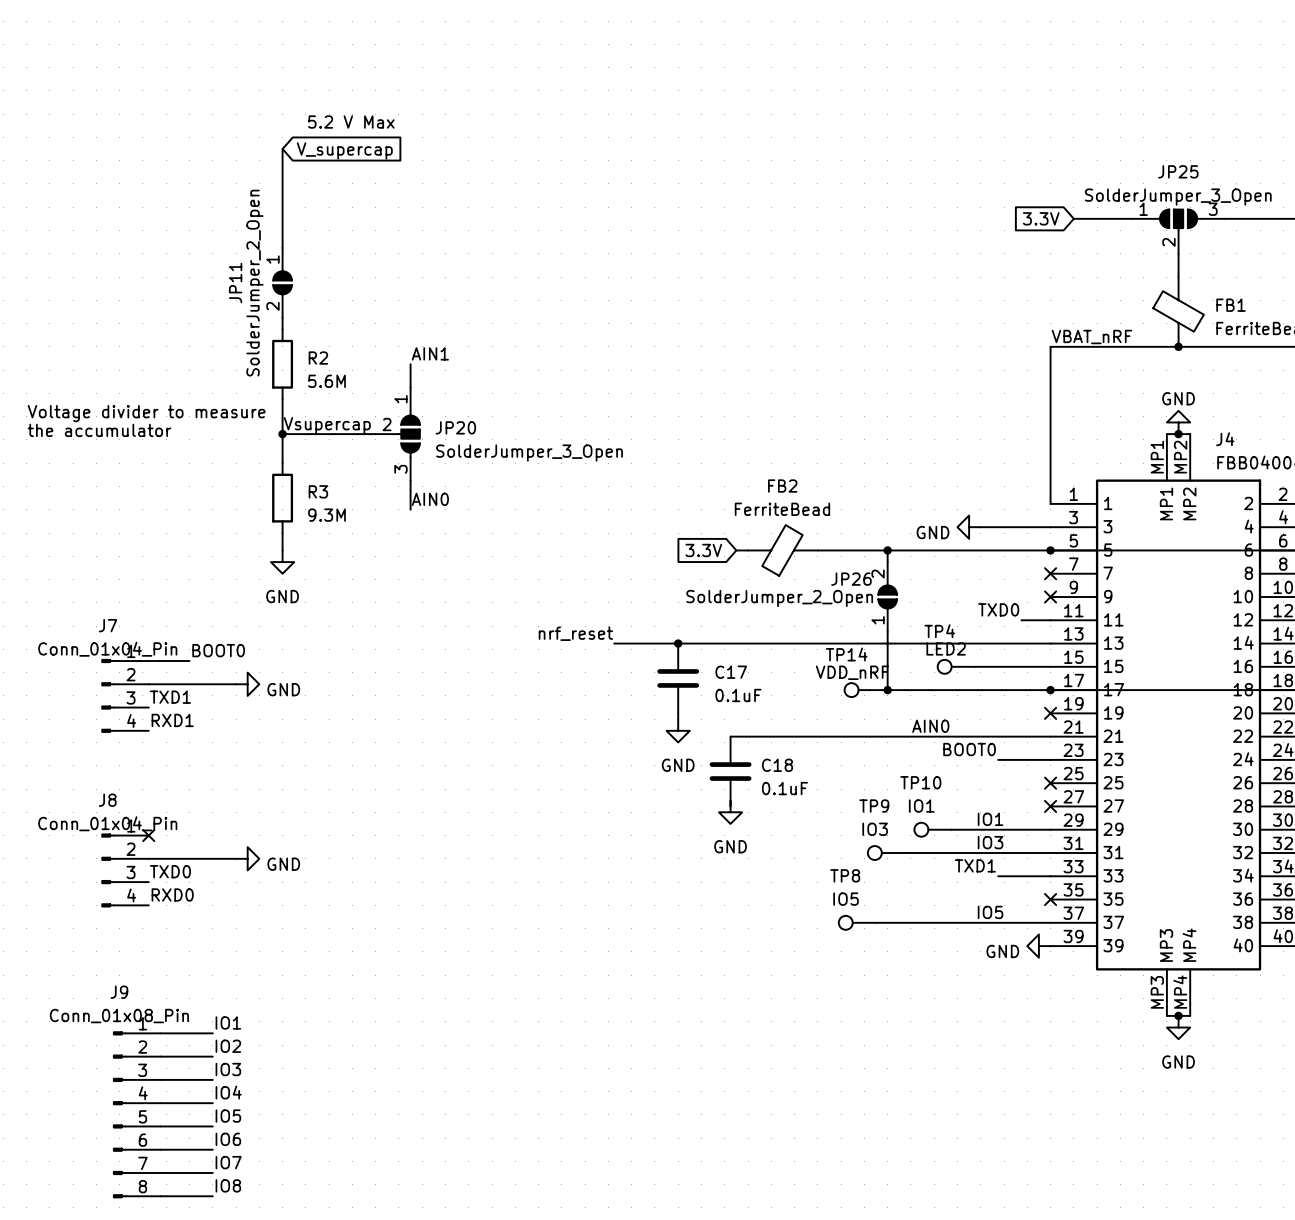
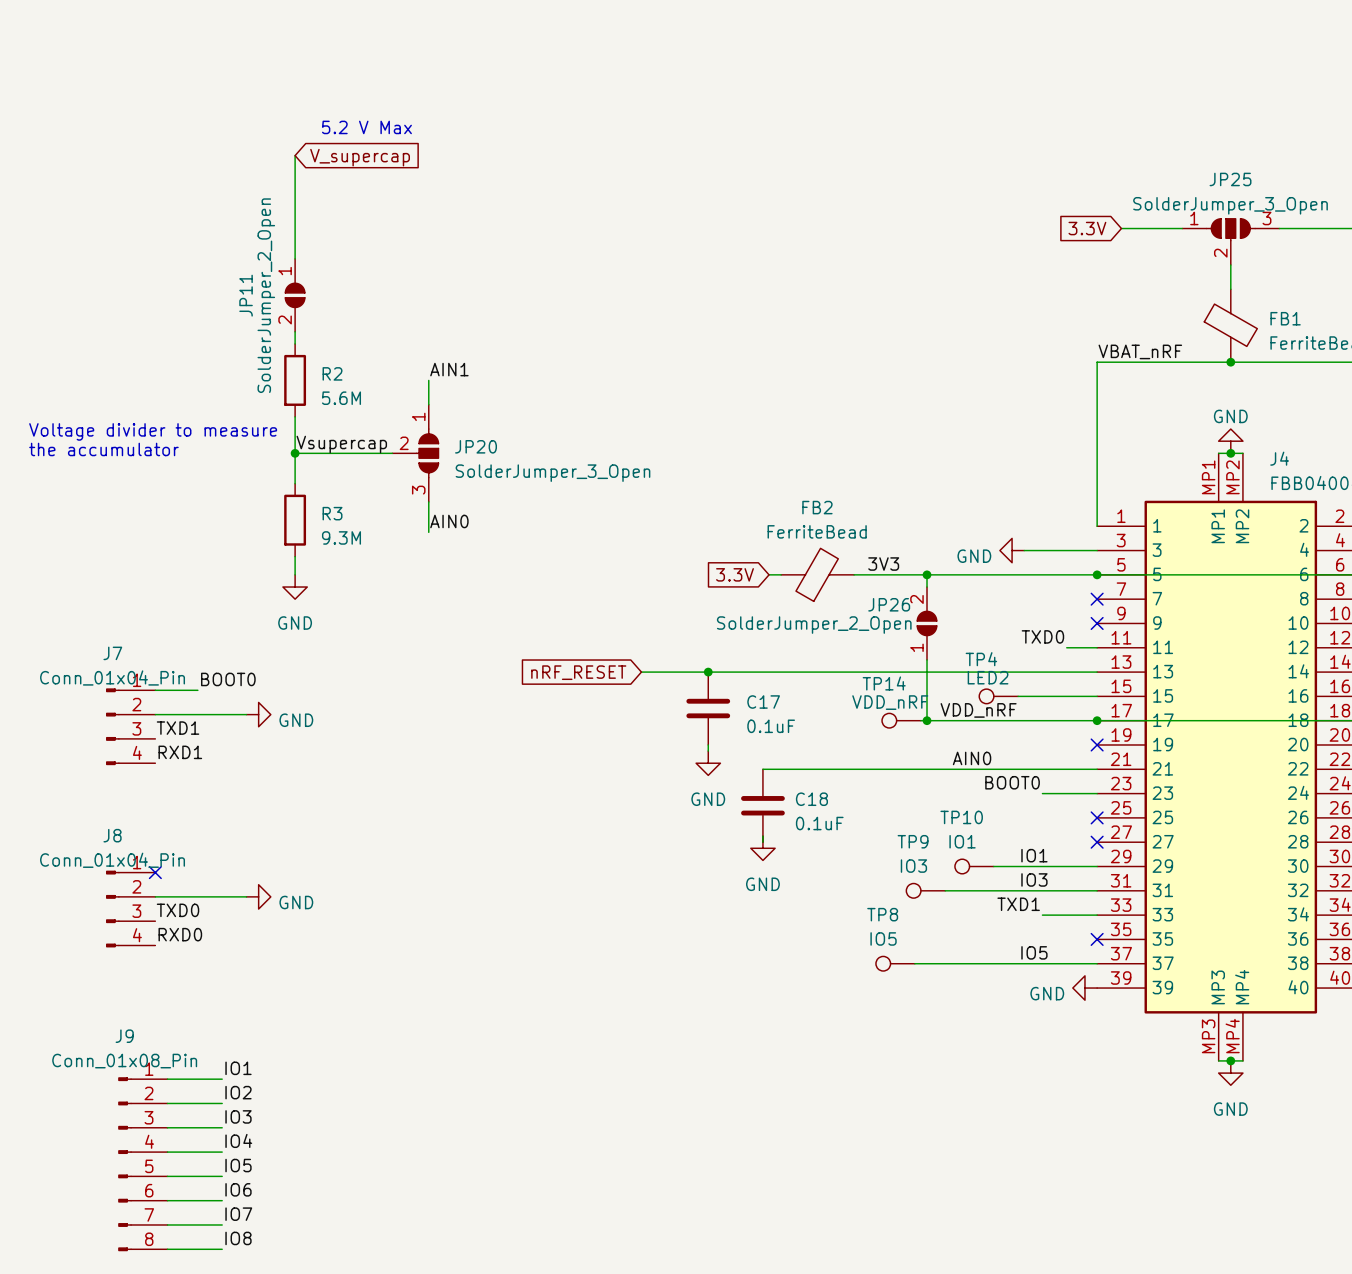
label: none -> 3V3 (883, 564)
label: nrf_reset (575, 633) -> none
global label: none -> nRF_RESET (578, 672)
label: none -> VDD_nRF (978, 710)

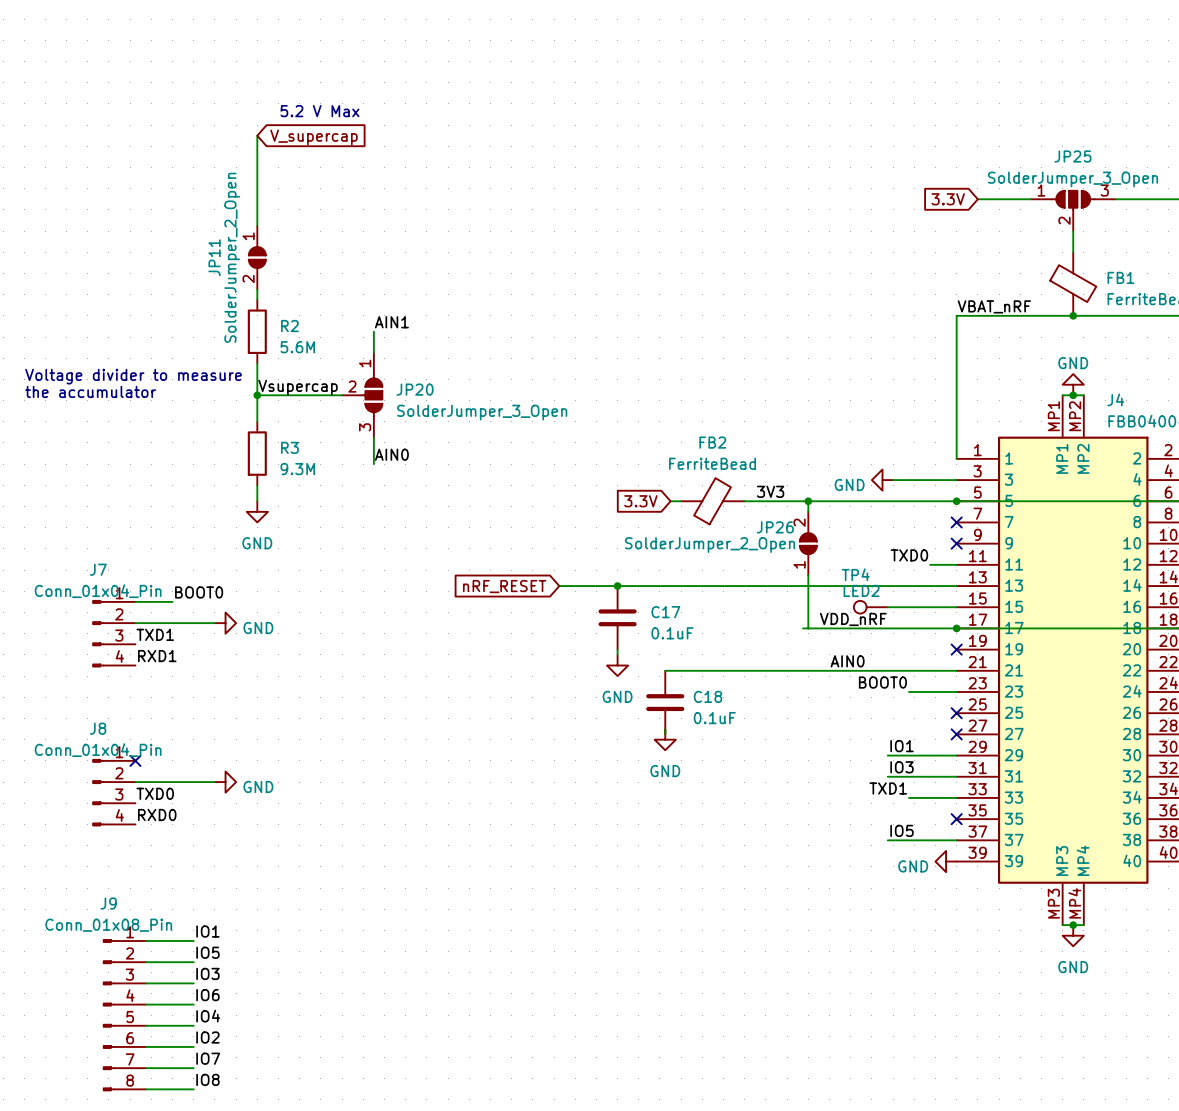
TP14: VDD_nRF (901, 720) -> none
junction: (927, 720) -> none
TP10: IO1 (974, 866) -> none
wire: (993, 866) (1018, 866) -> none
TP9: IO3 (925, 890) -> none
wire: (945, 890) (1018, 890) -> none
TP8: IO5 (895, 963) -> none
wire: (914, 963) (1018, 963) -> none
label: IO2 (238, 1092) -> IO5 (207, 952)
label: IO4 (238, 1140) -> IO6 (207, 995)
label: IO5 (238, 1165) -> IO4 (208, 1016)
label: IO6 (238, 1189) -> IO2 (207, 1037)

